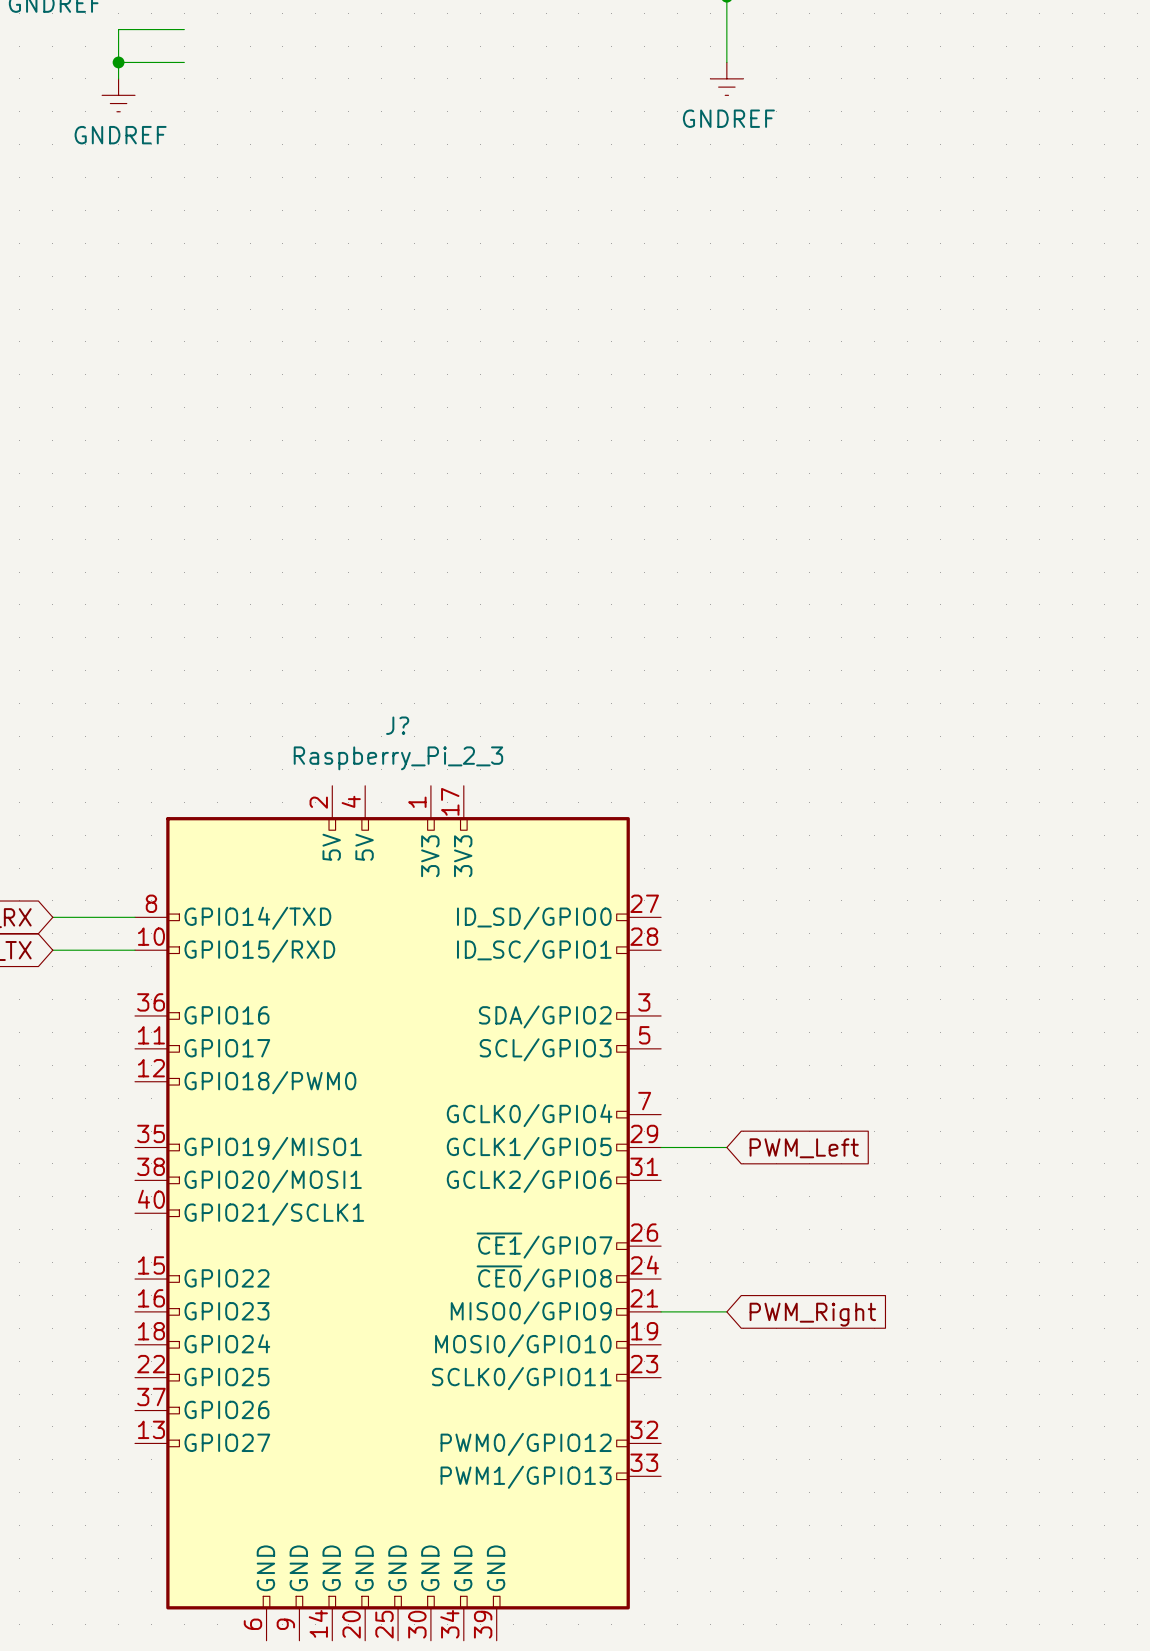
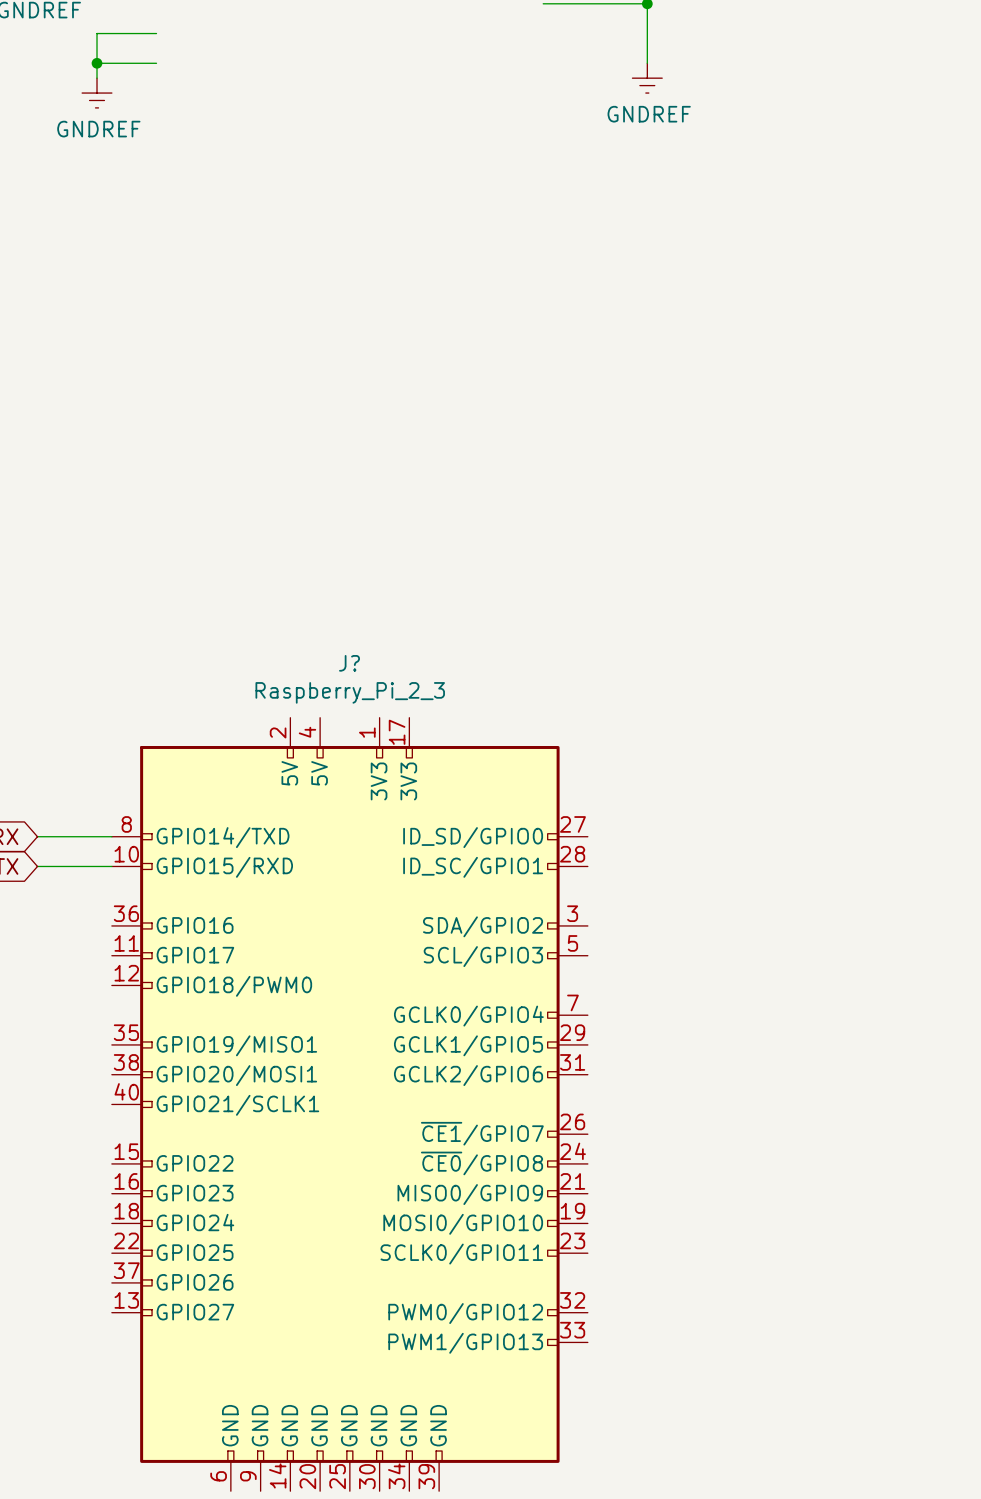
wire: (661, 1147) (726, 1147) -> none
global label: PWM_Left (804, 1148) -> none
wire: (661, 1311) (726, 1311) -> none
global label: PWM_Right (812, 1314) -> none

